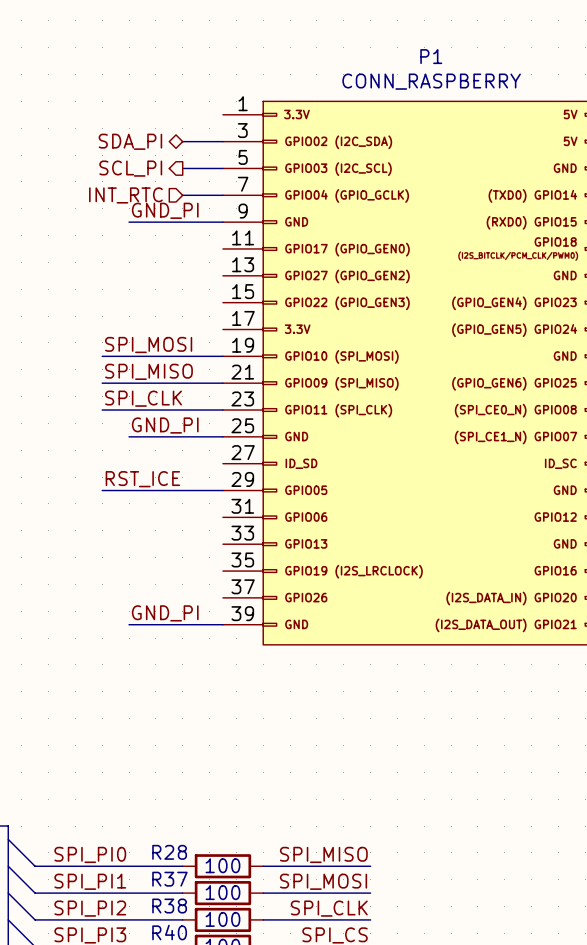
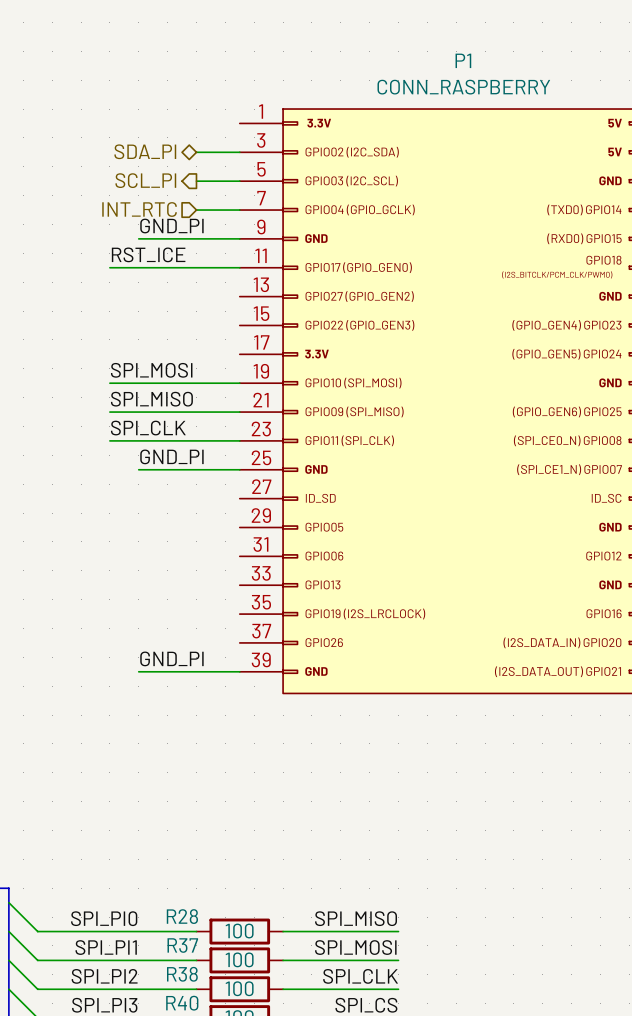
label position: RST_ICE (142, 479) -> RST_ICE (148, 254)
wire: (102, 490) (222, 490) -> (109, 267) (239, 267)

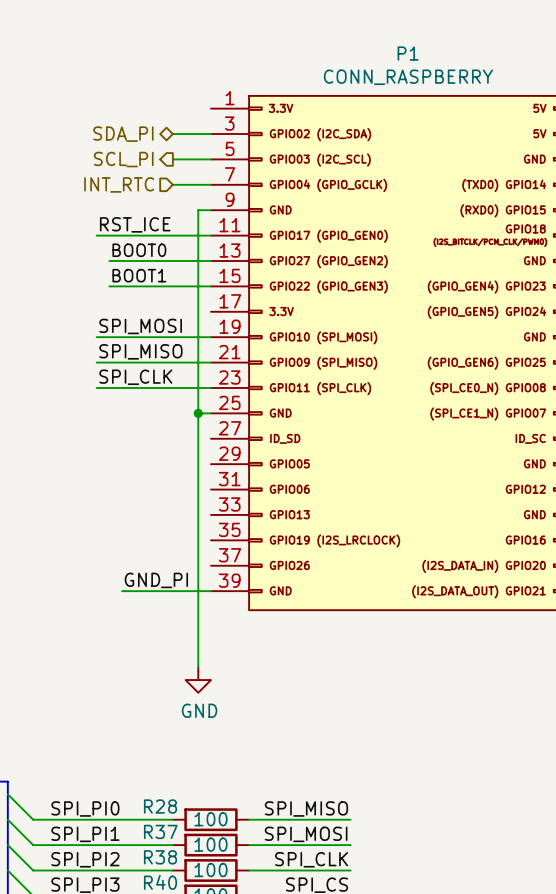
label: GND_PI (171, 226) -> none
wire: (138, 238) (225, 238) -> (198, 667) (198, 210)
label: none -> BOOT0 (139, 250)
wire: none -> (109, 261) (210, 261)
label: none -> BOOT1 (139, 275)
wire: none -> (109, 286) (210, 286)
label: GND_PI (171, 456) -> none
wire: (138, 469) (225, 469) -> none
junction: none -> (198, 413)
power symbol: none -> GND (198, 680)

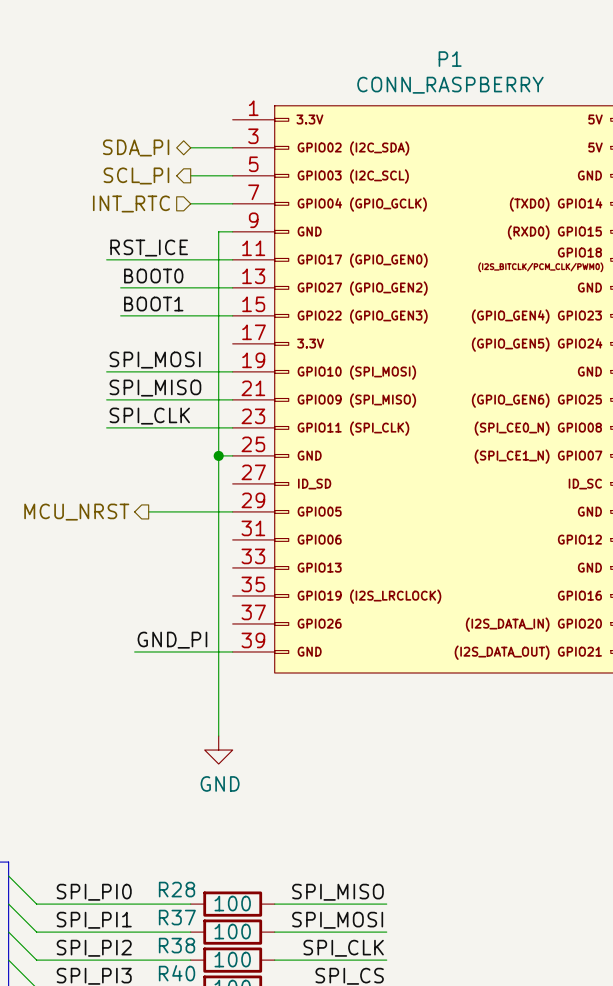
hierarchical label: none -> MCU_NRST (76, 512)
wire: none -> (148, 511) (232, 511)

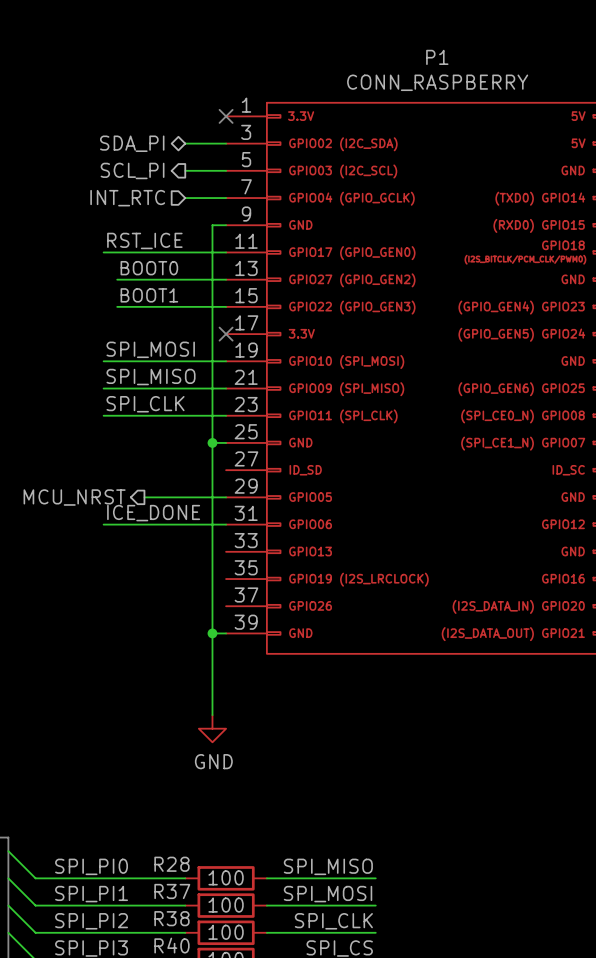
no-connect mark: none -> (226, 116)
no-connect mark: none -> (226, 334)
label: none -> ICE_DONE (153, 513)
wire: none -> (103, 524) (226, 524)
label: GND_PI (172, 640) -> none
wire: (134, 651) (218, 651) -> none
junction: none -> (212, 633)

